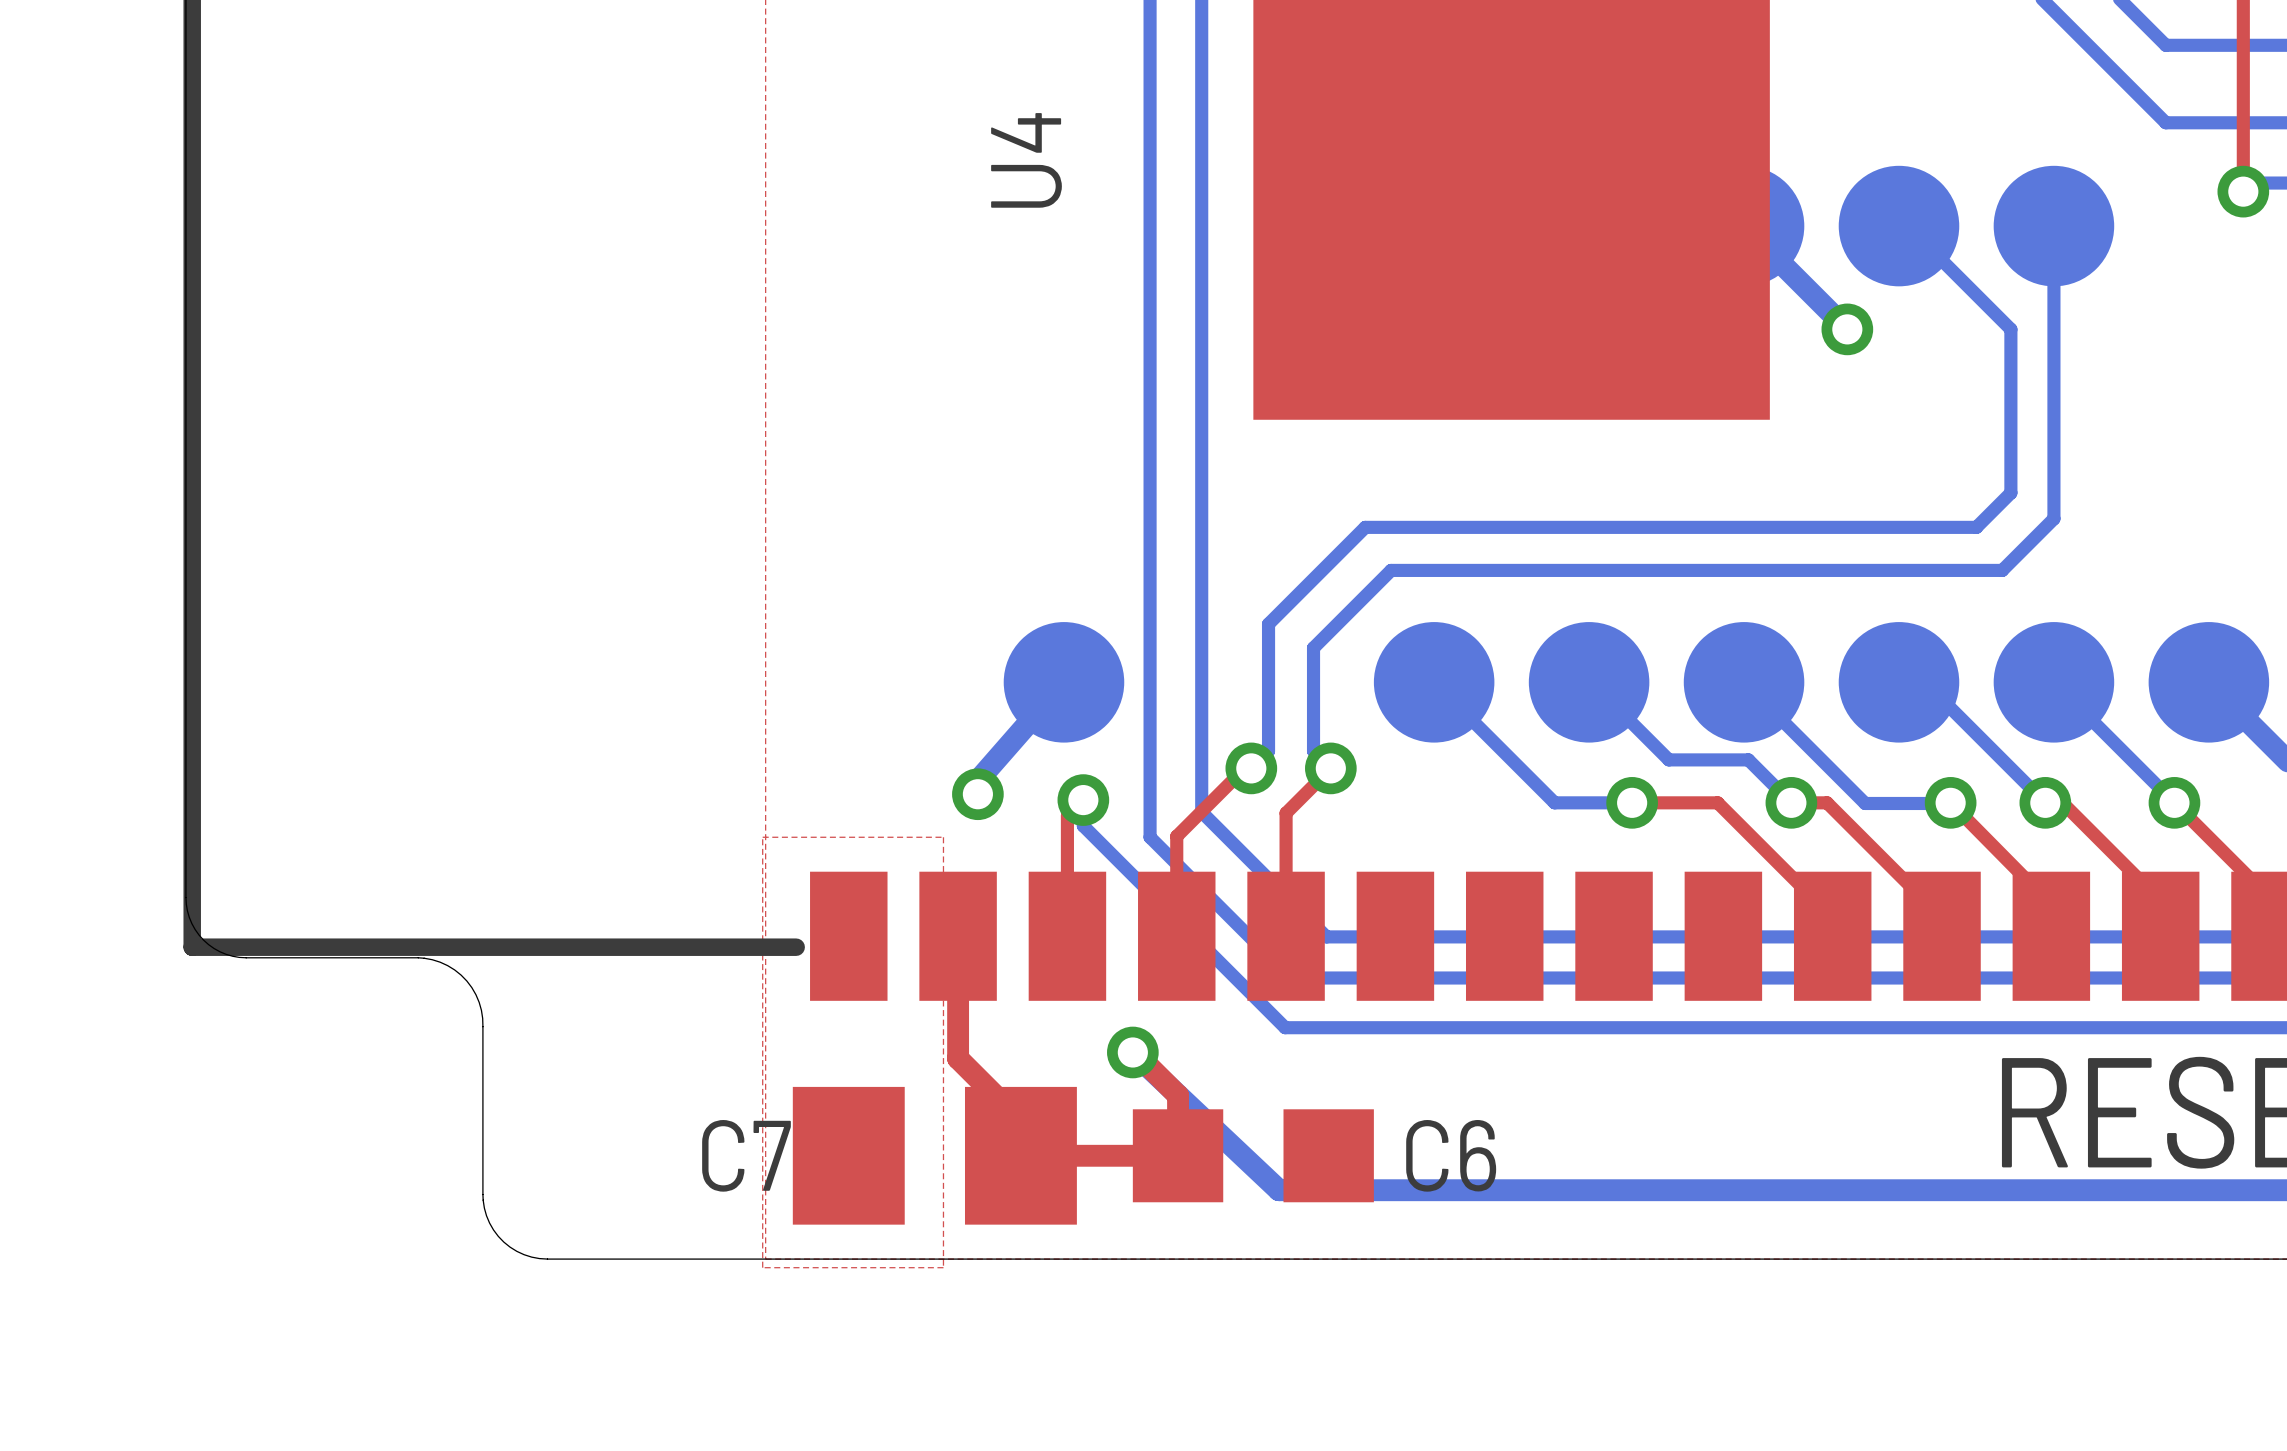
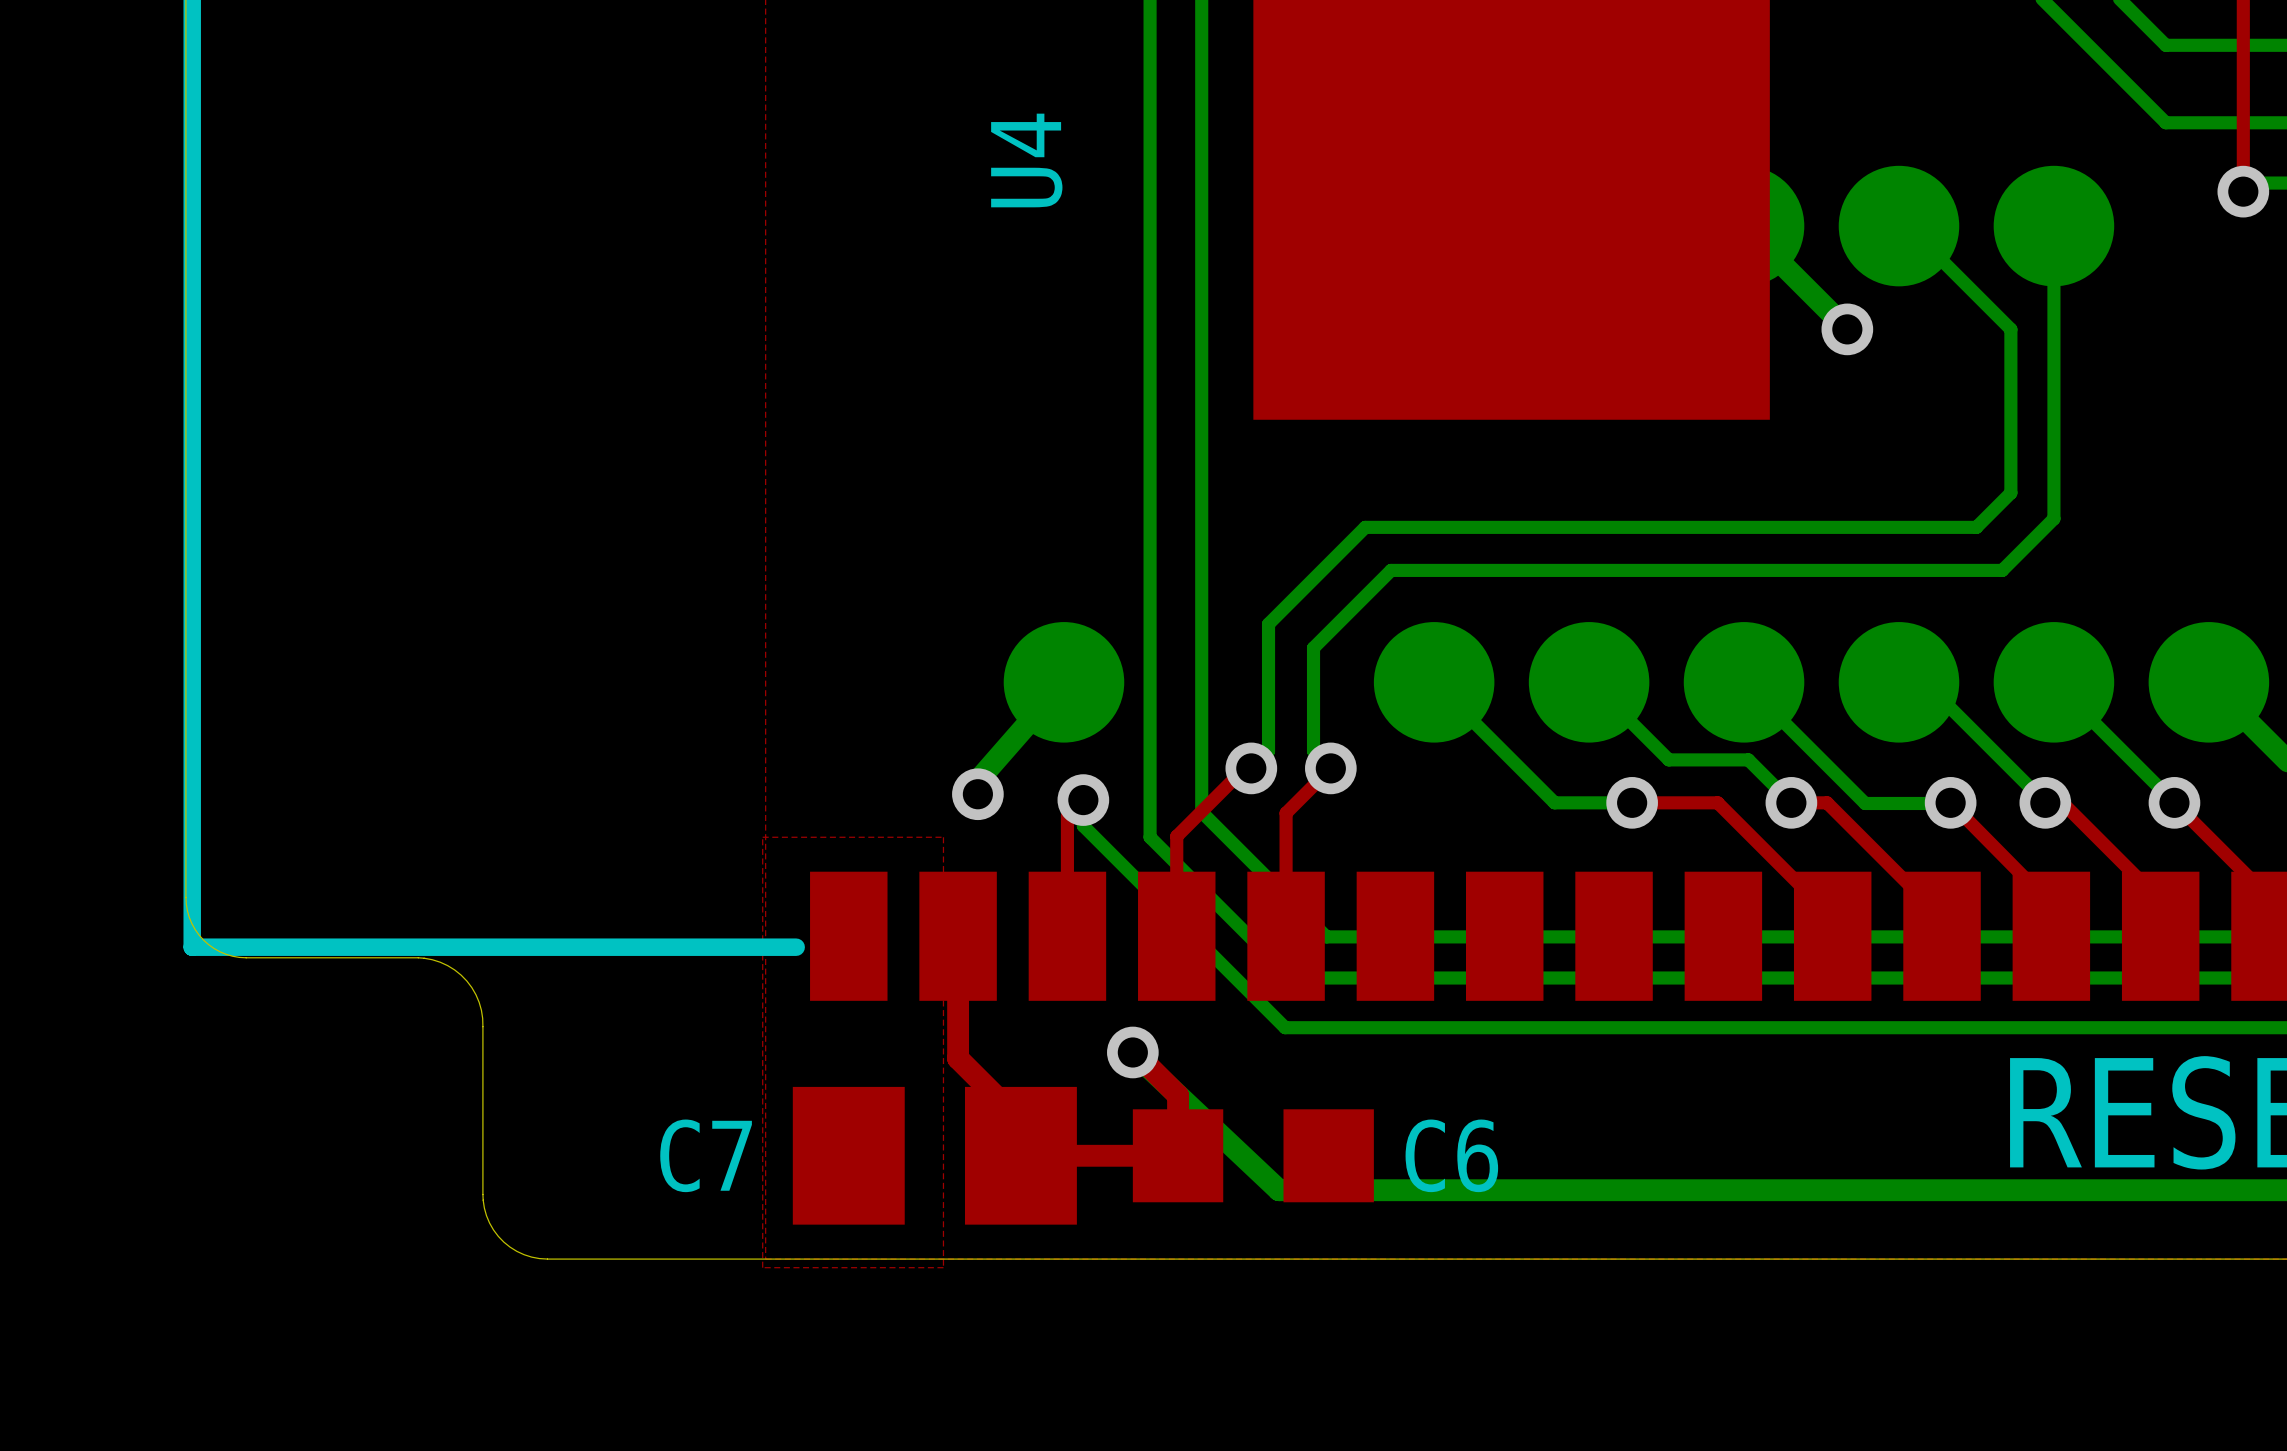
C7 name position: C7 (746, 1155) -> C7 (706, 1155)

